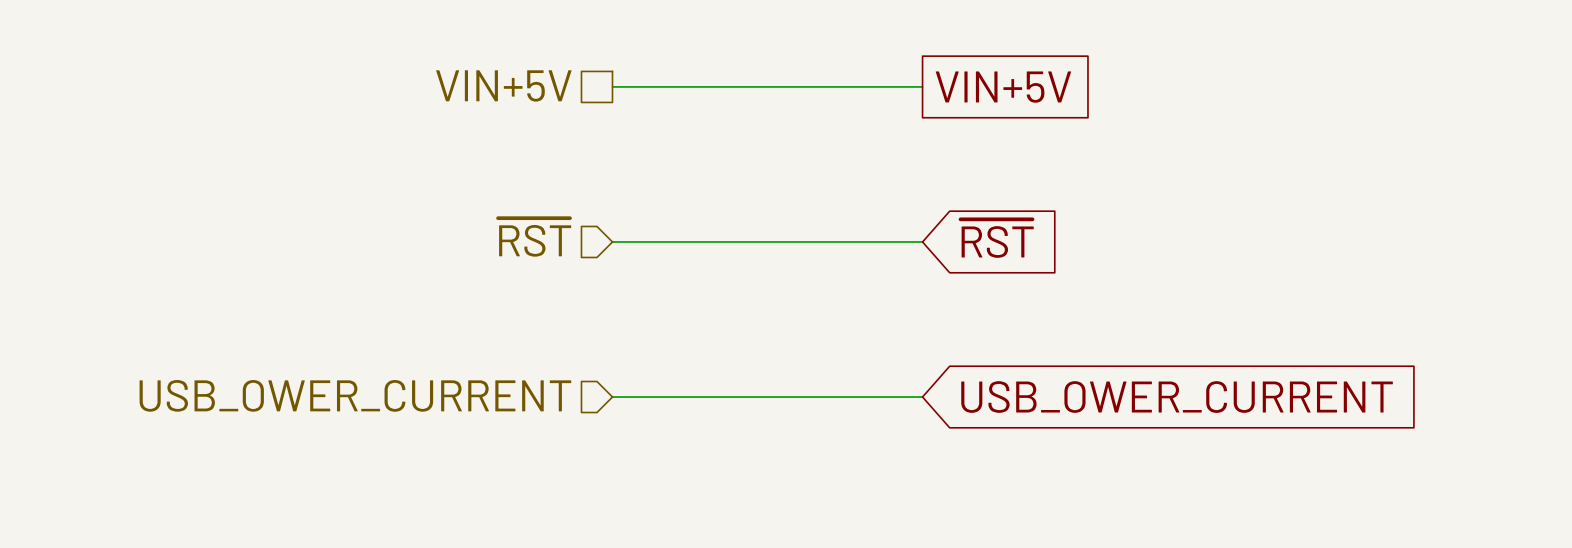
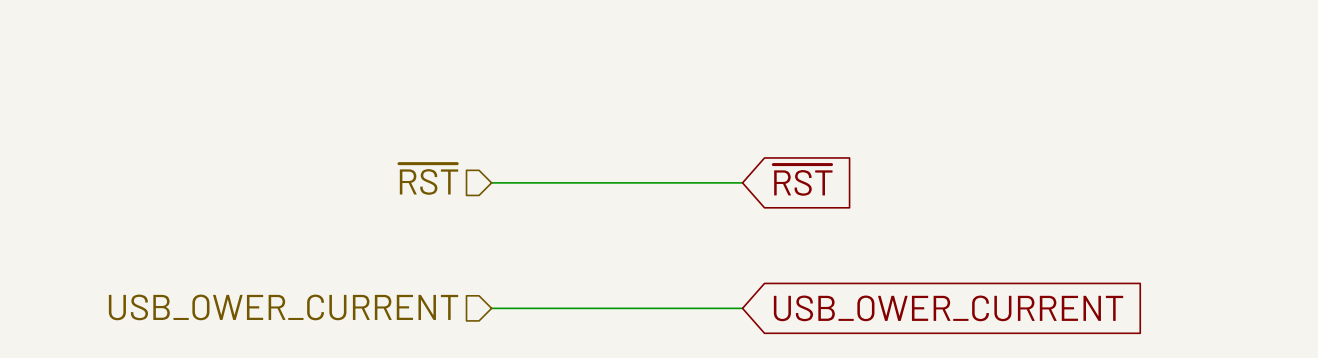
hierarchical label: VIN+5V (503, 85) -> none
wire: (612, 86) (922, 86) -> none
global label: VIN+5V (1003, 87) -> none

